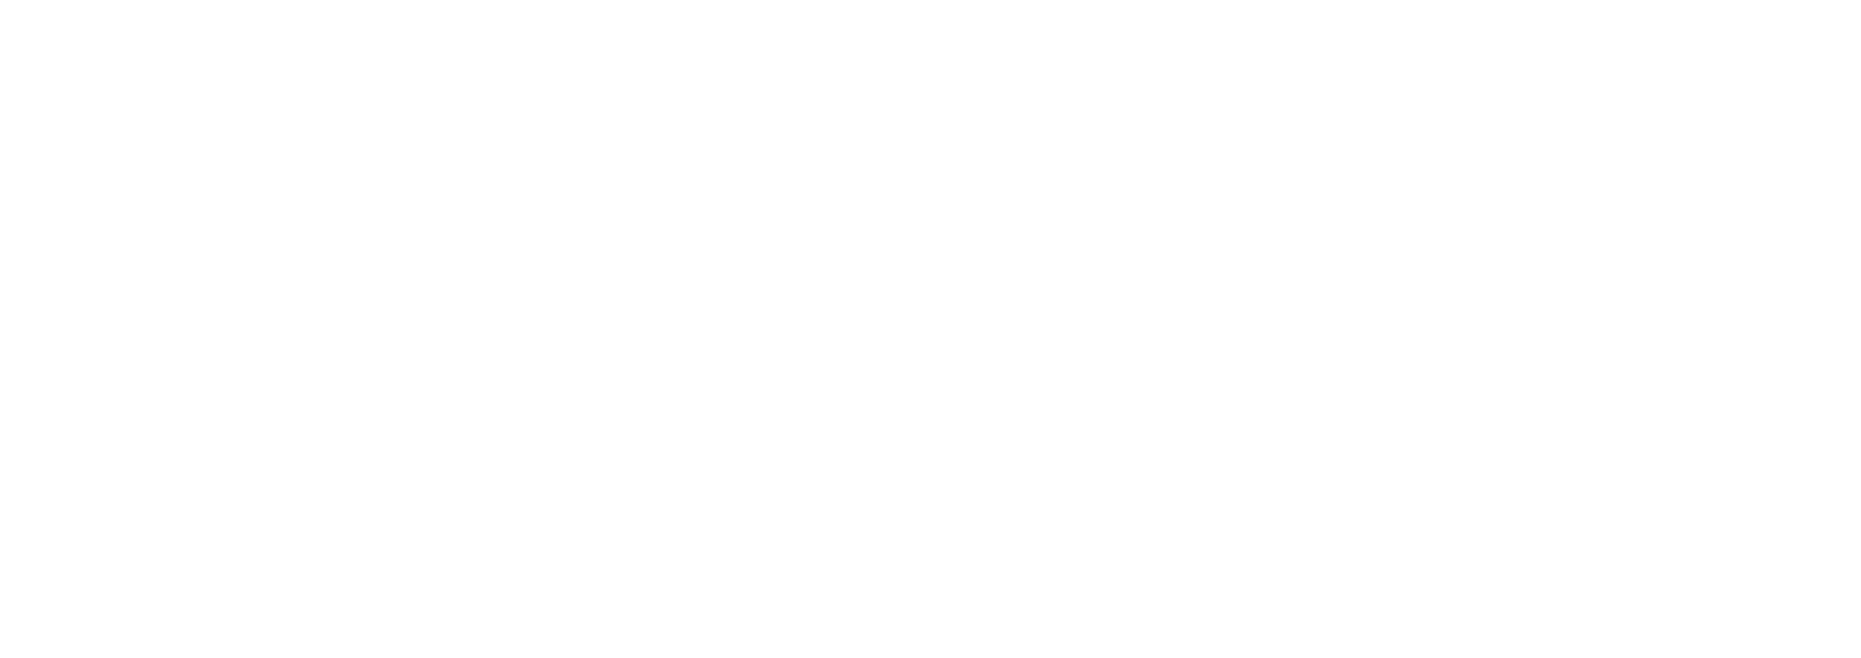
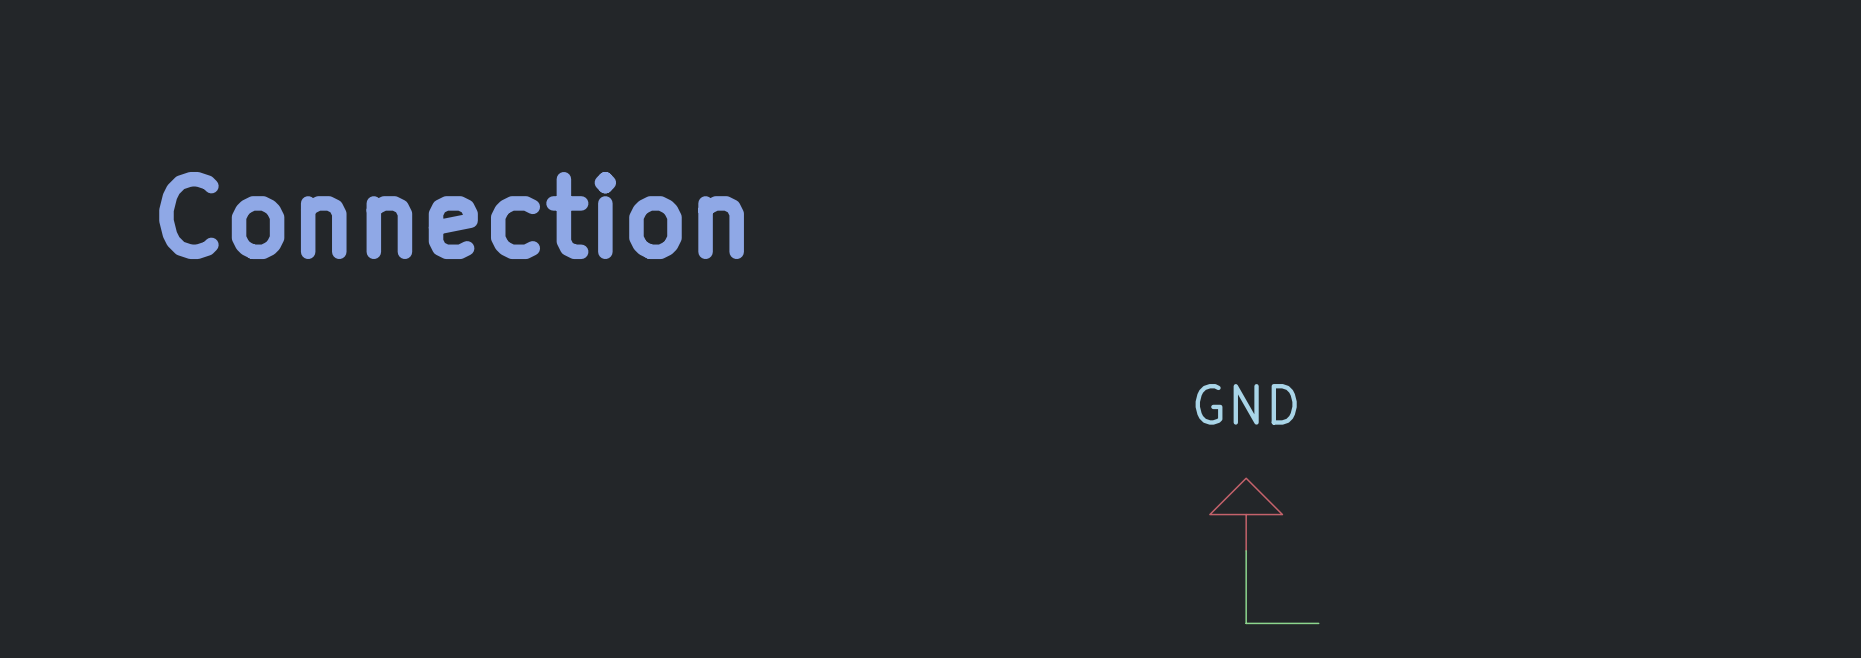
text: none -> Connection (451, 215)
power symbol: none -> GND (1246, 514)
wire: none -> (1246, 550) (1246, 623) (1318, 623)

